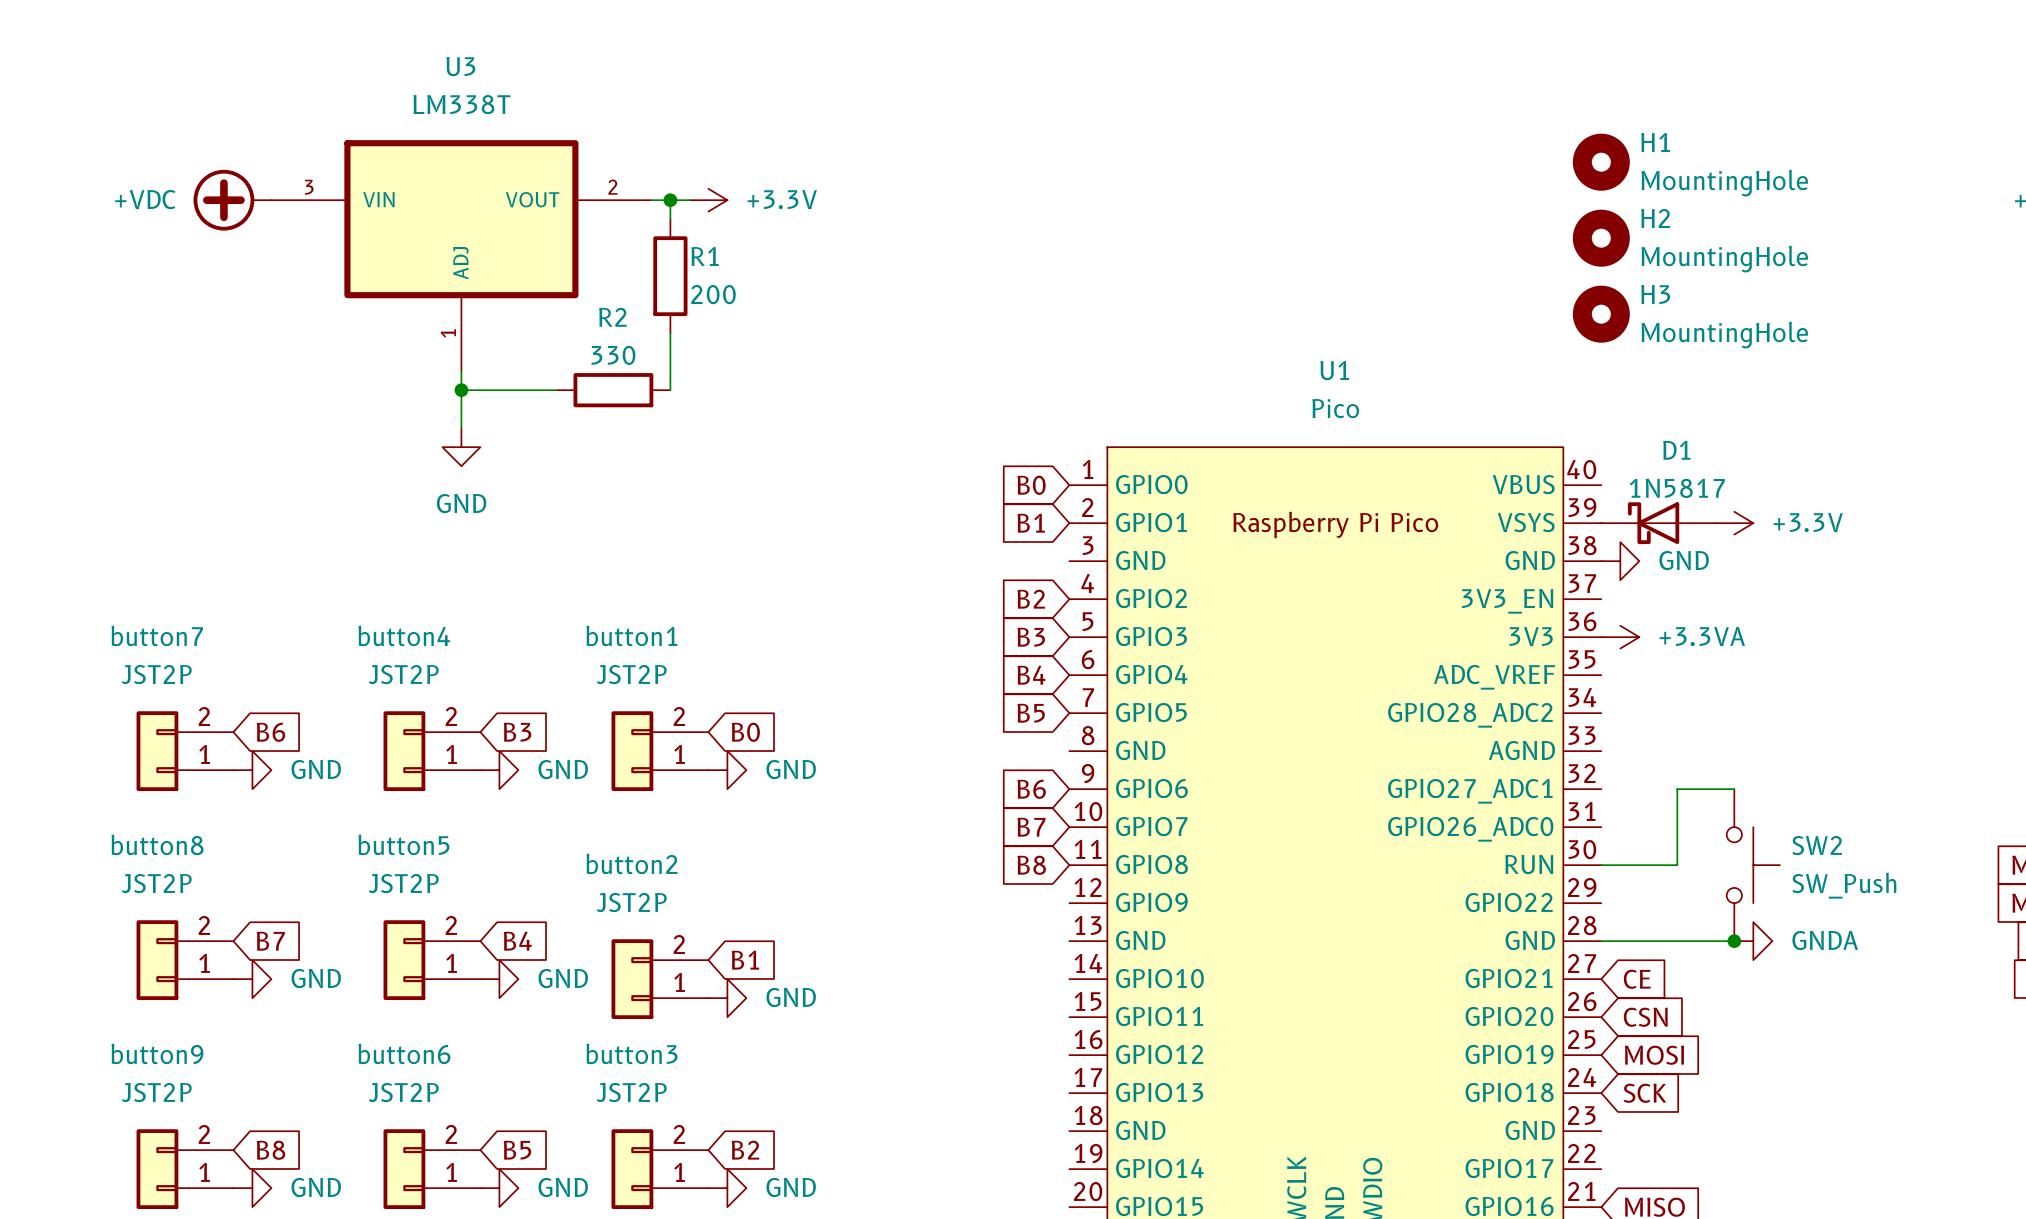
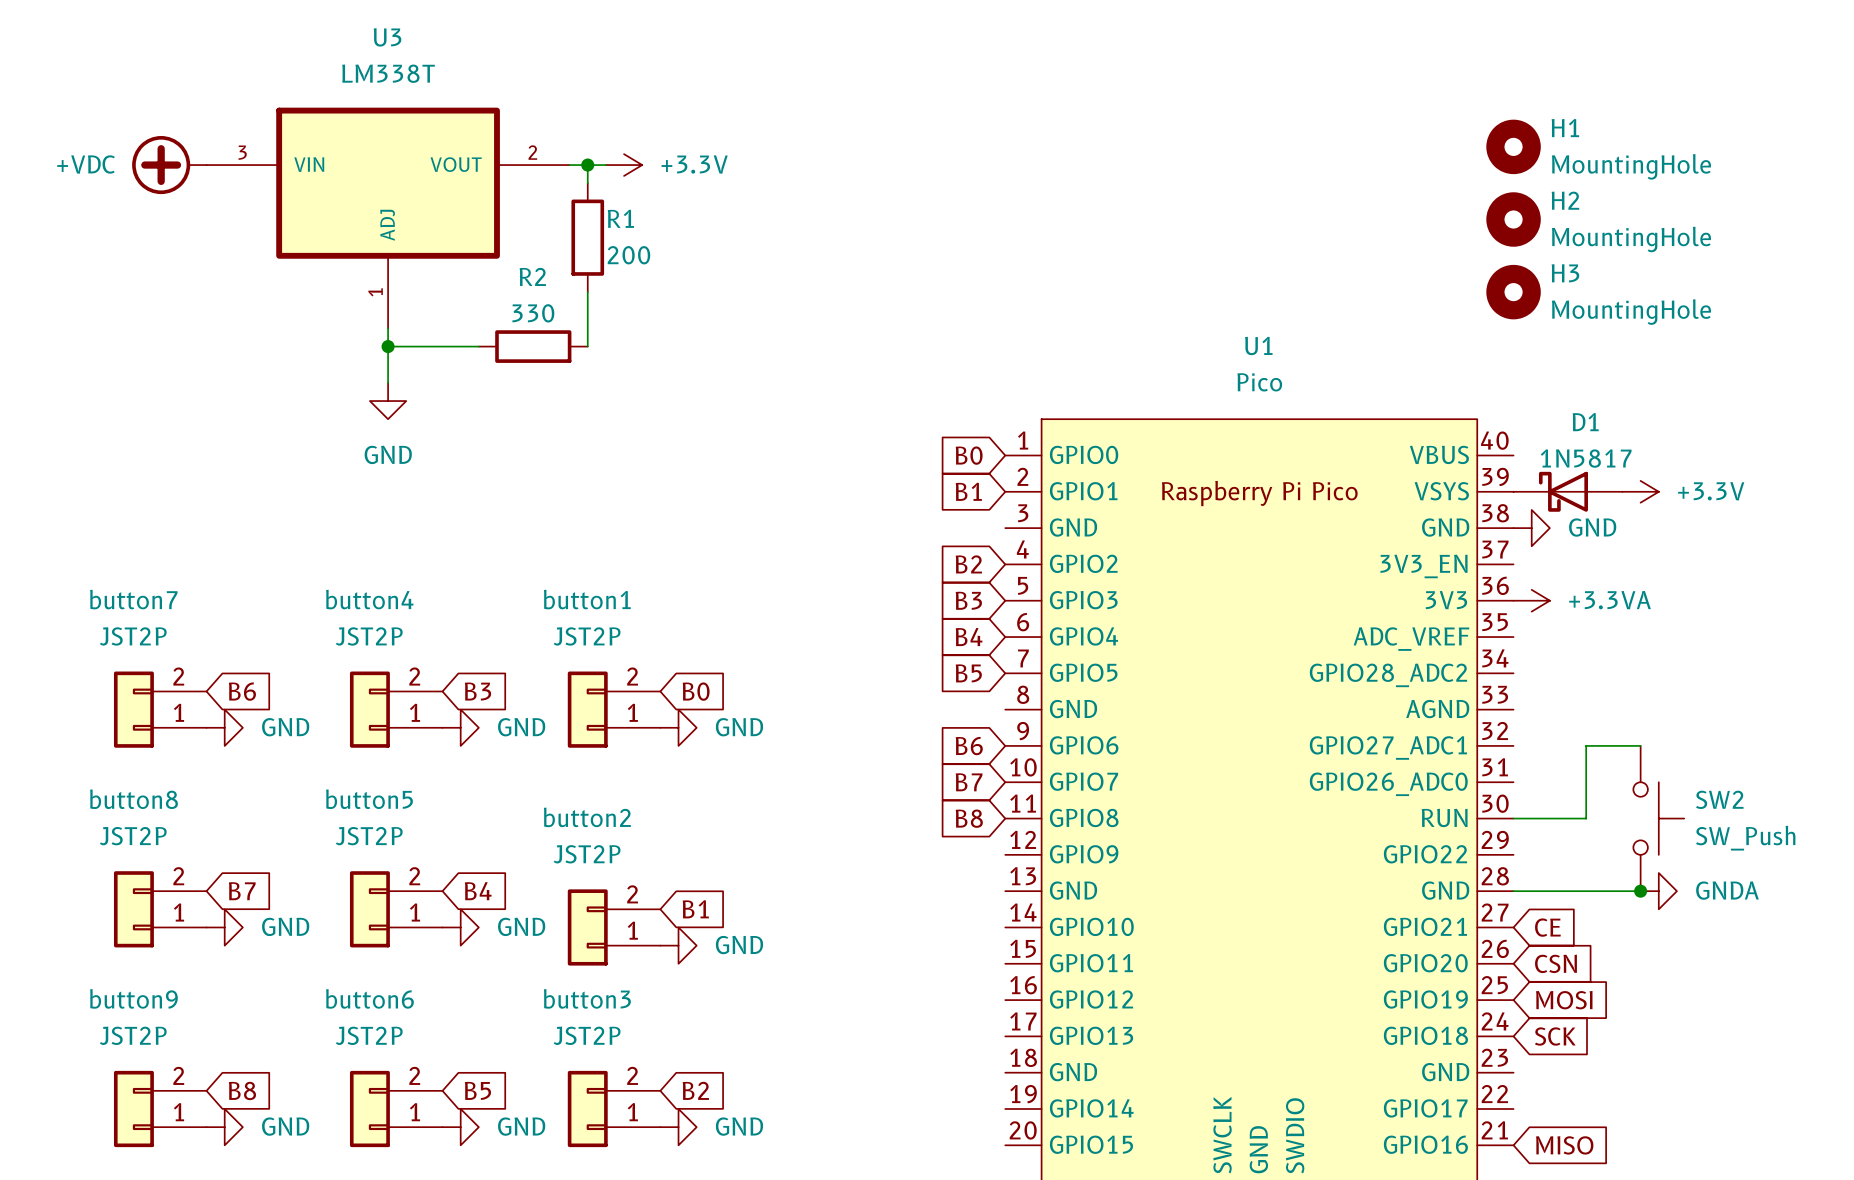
power symbol position: +VDC (232, 200) -> +VDC (169, 165)
wire: (651, 200) (689, 200) -> (569, 165) (605, 165)
wire: (670, 200) (670, 219) -> (587, 165) (587, 183)
junction position: (670, 200) -> (587, 165)
power symbol position: +3.3V (708, 200) -> +3.3V (624, 165)
U3 position: (461, 255) -> (388, 218)
R1 position: (670, 276) -> (587, 237)
wire: (670, 333) (670, 390) -> (587, 292) (587, 346)
wire: (461, 371) (461, 428) -> (388, 328) (388, 382)
wire: (461, 390) (556, 390) -> (388, 346) (478, 346)
junction position: (461, 390) -> (388, 346)
R2 position: (613, 390) -> (533, 346)
power symbol position: GND (461, 447) -> GND (388, 401)

